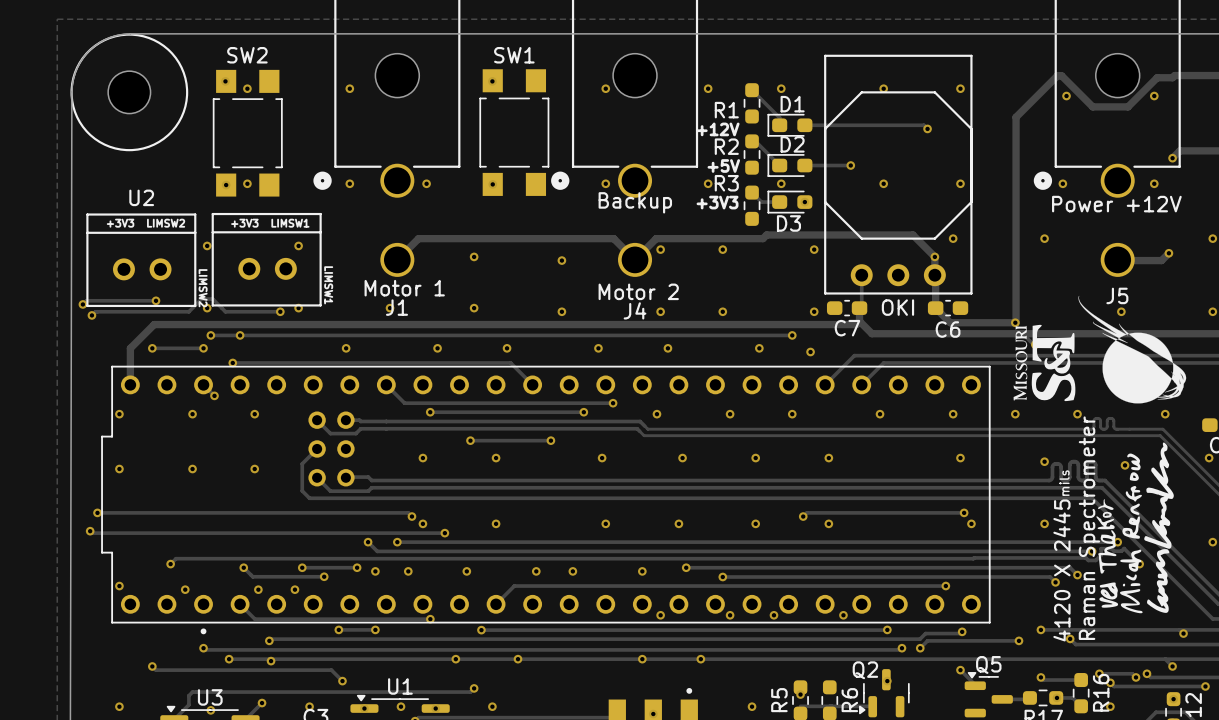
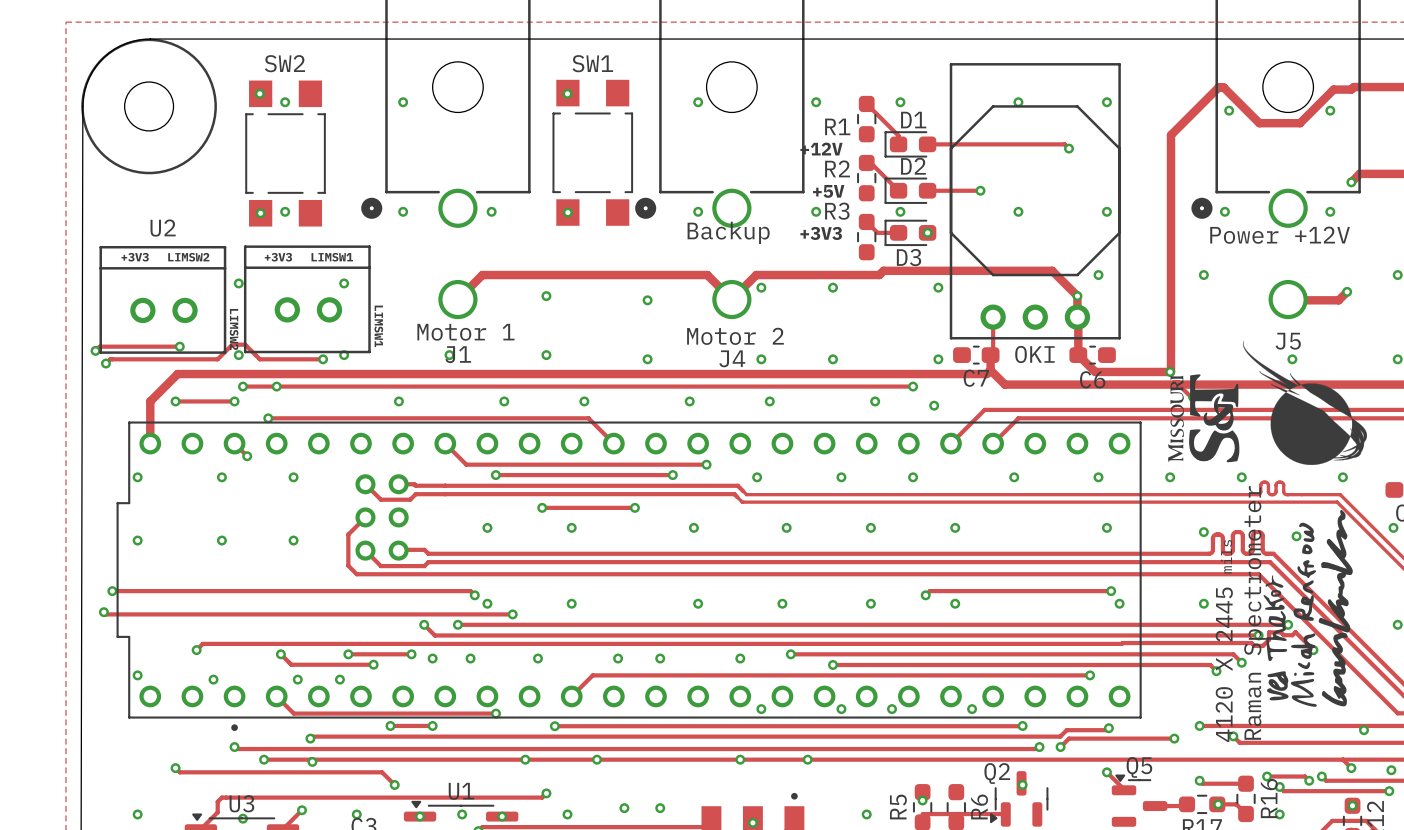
via: none -> (1391, 770)
via: none -> (624, 808)
via: none -> (660, 808)

